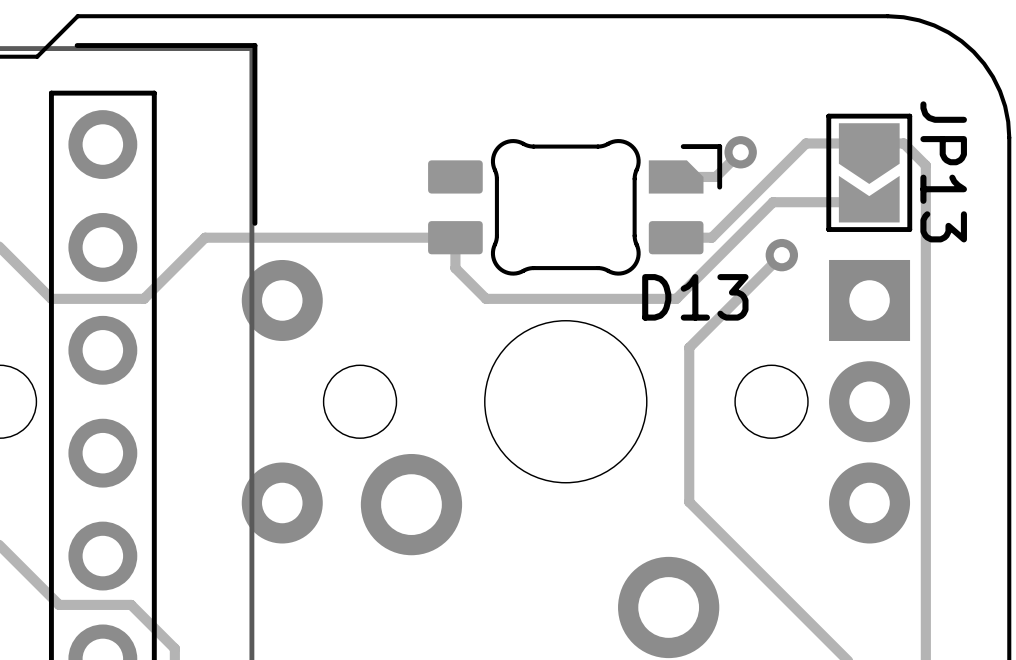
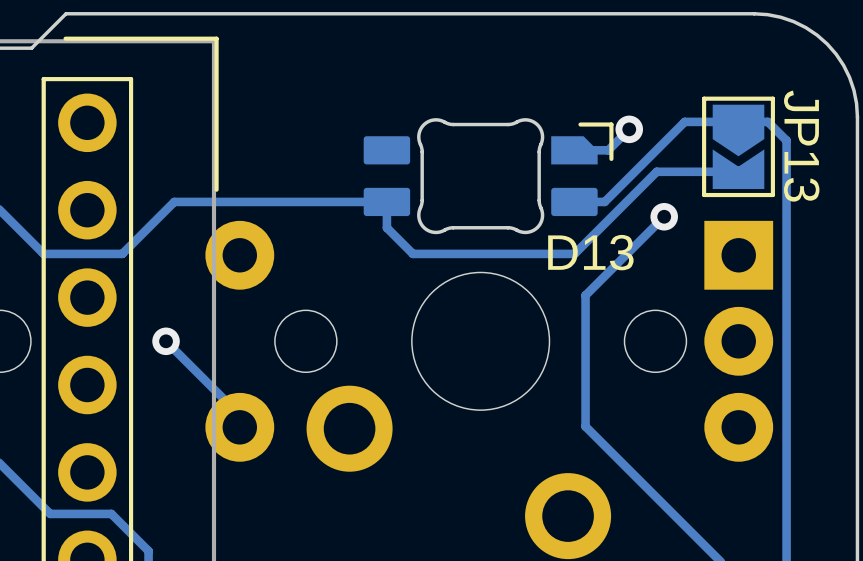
track: none -> (166, 341) (239, 415) (239, 427)
via: none -> (166, 341)

